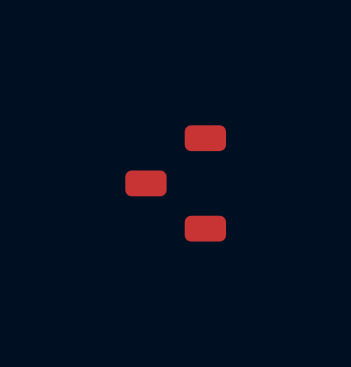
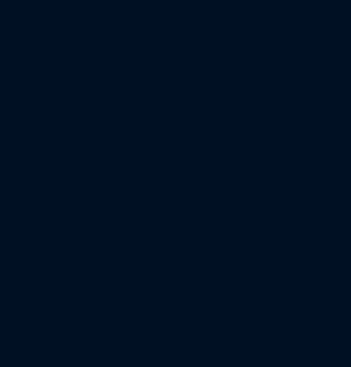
part: (175, 183) -> none

